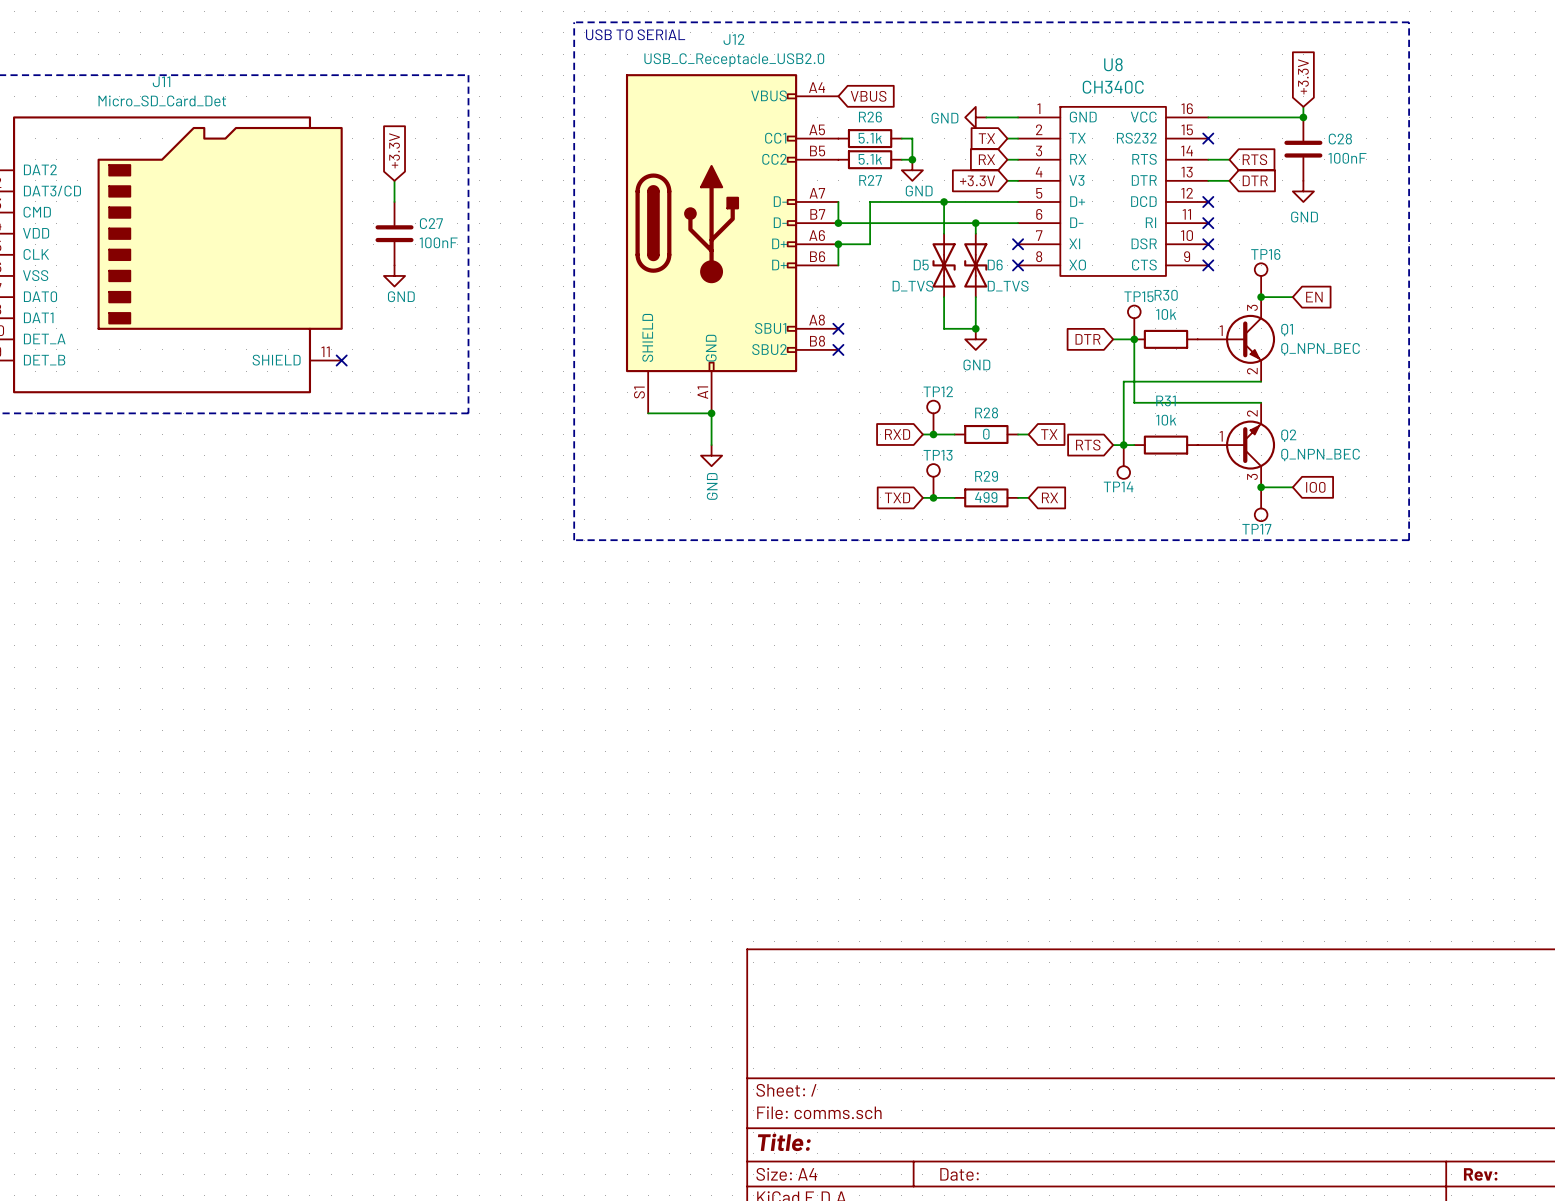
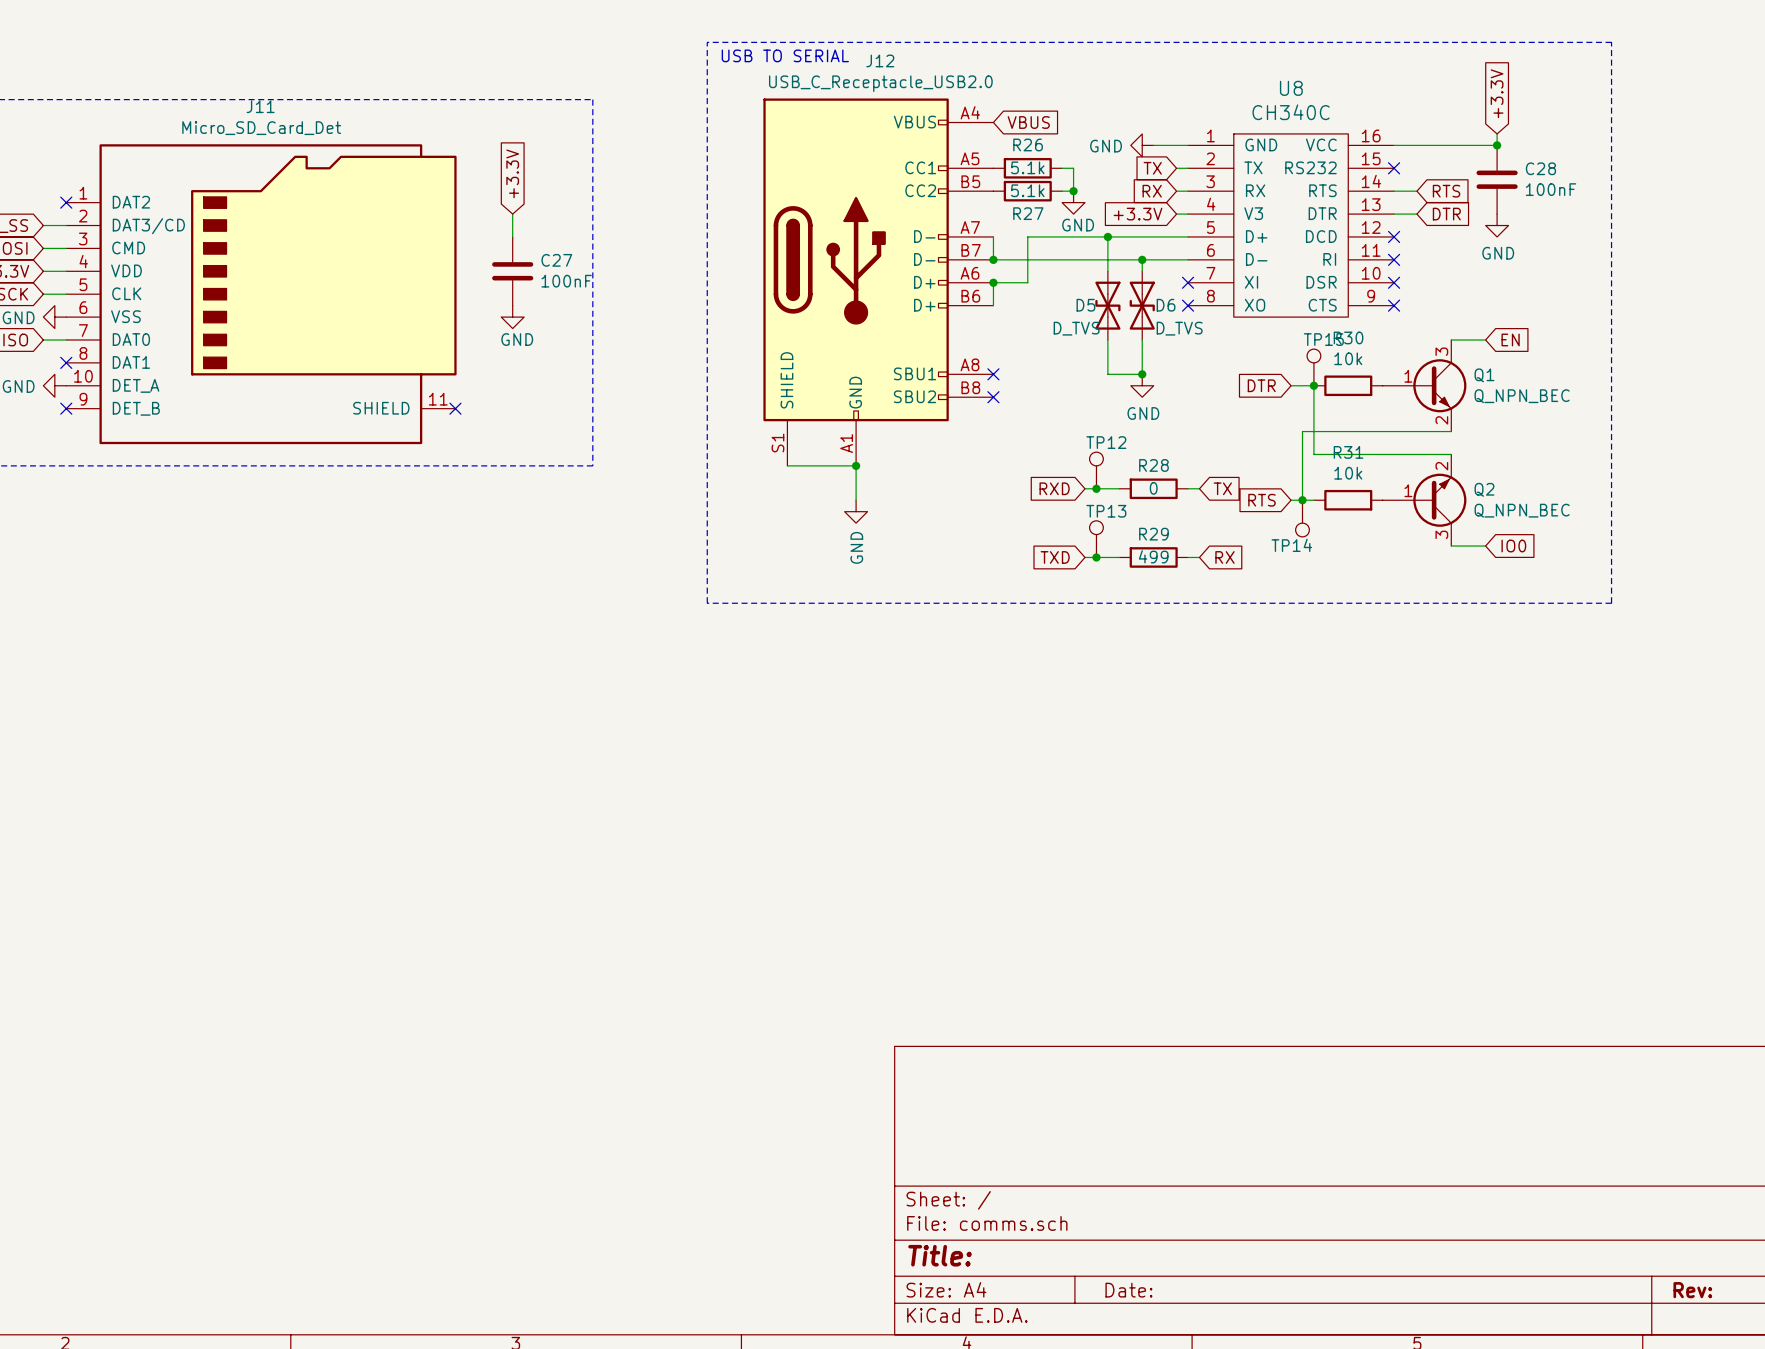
TP16: (1261, 280) -> none
junction: (1261, 297) -> none
junction: (1261, 487) -> none
TP17: (1261, 504) -> none

